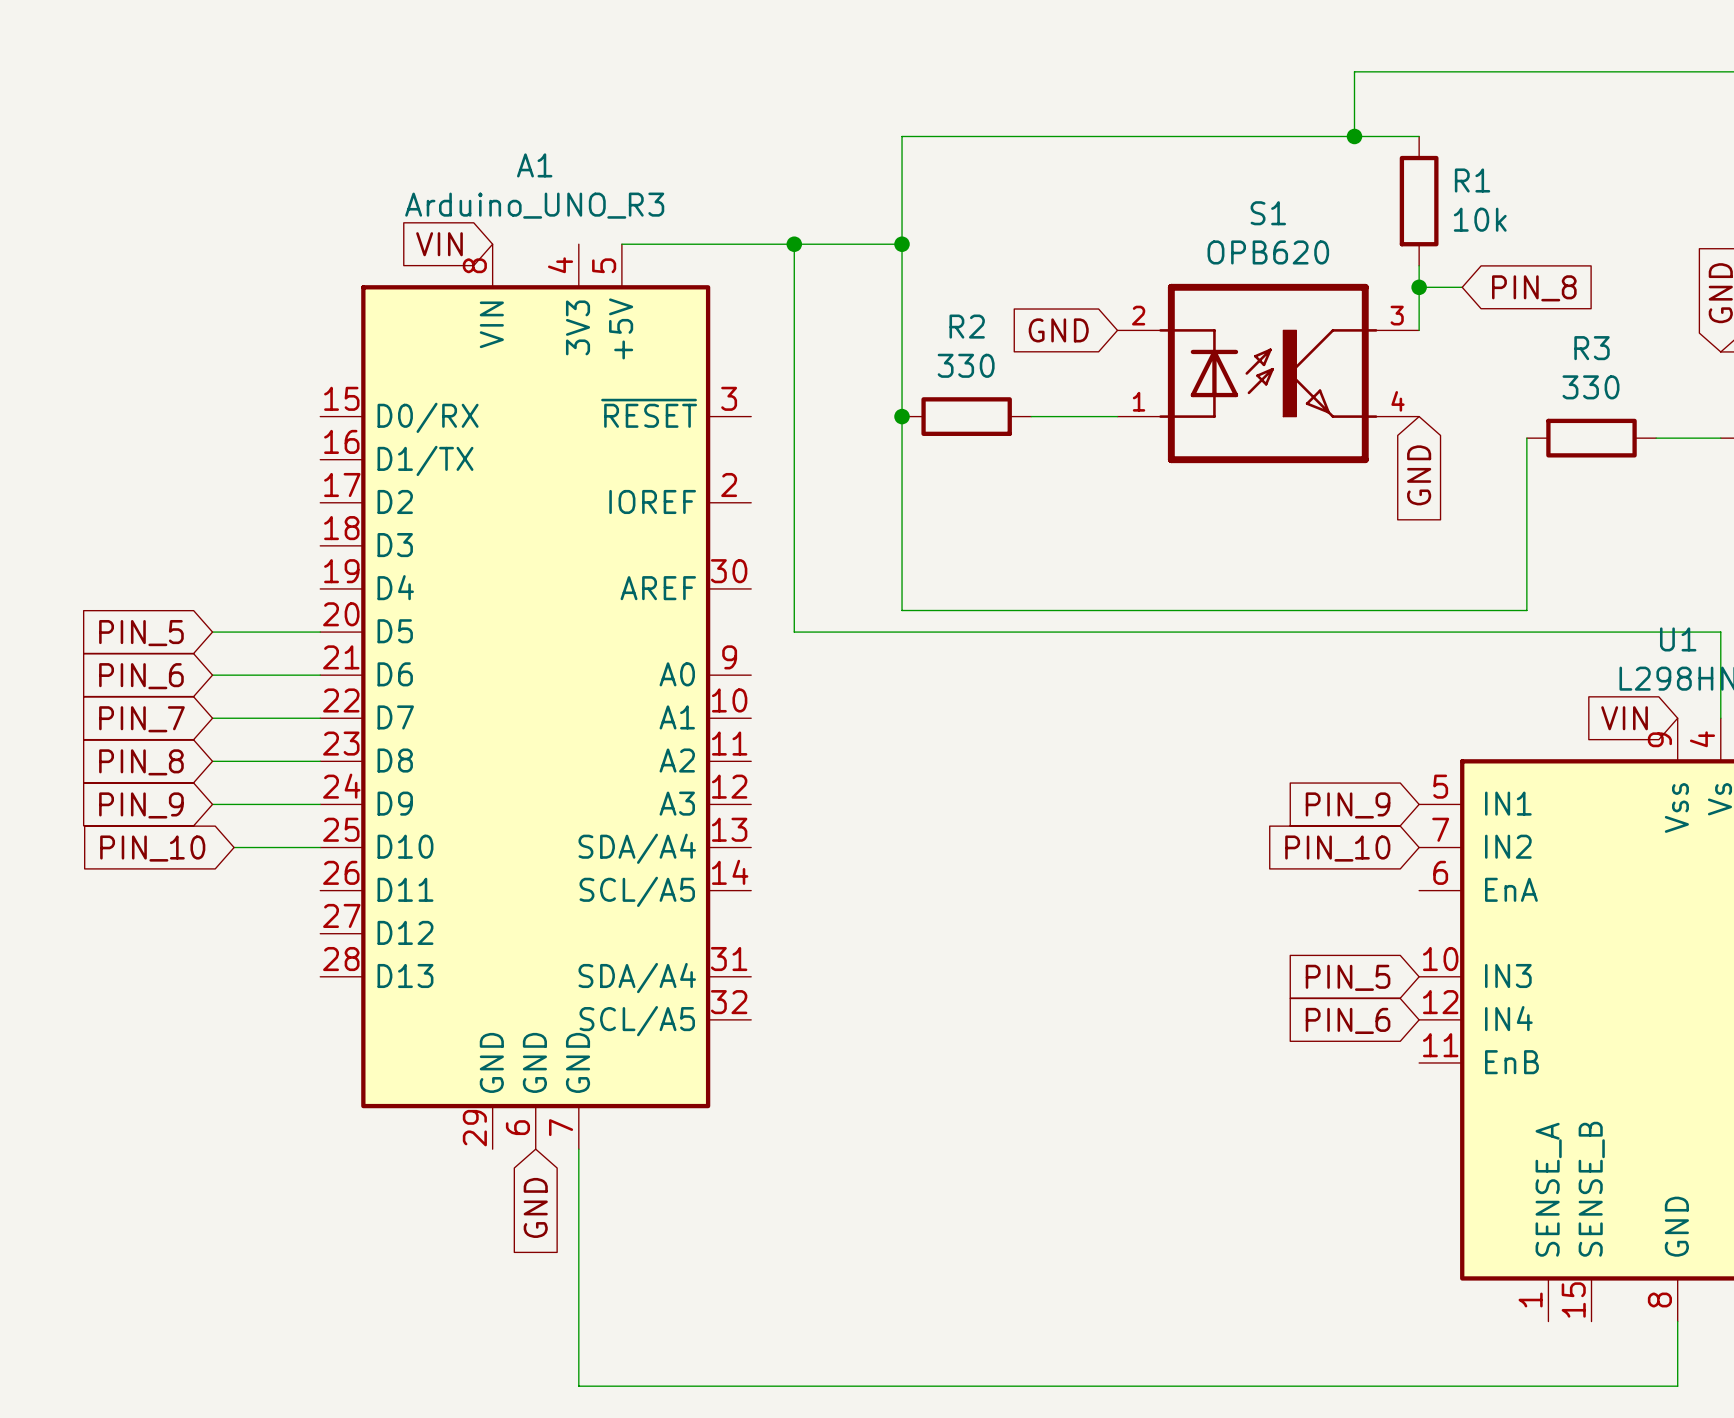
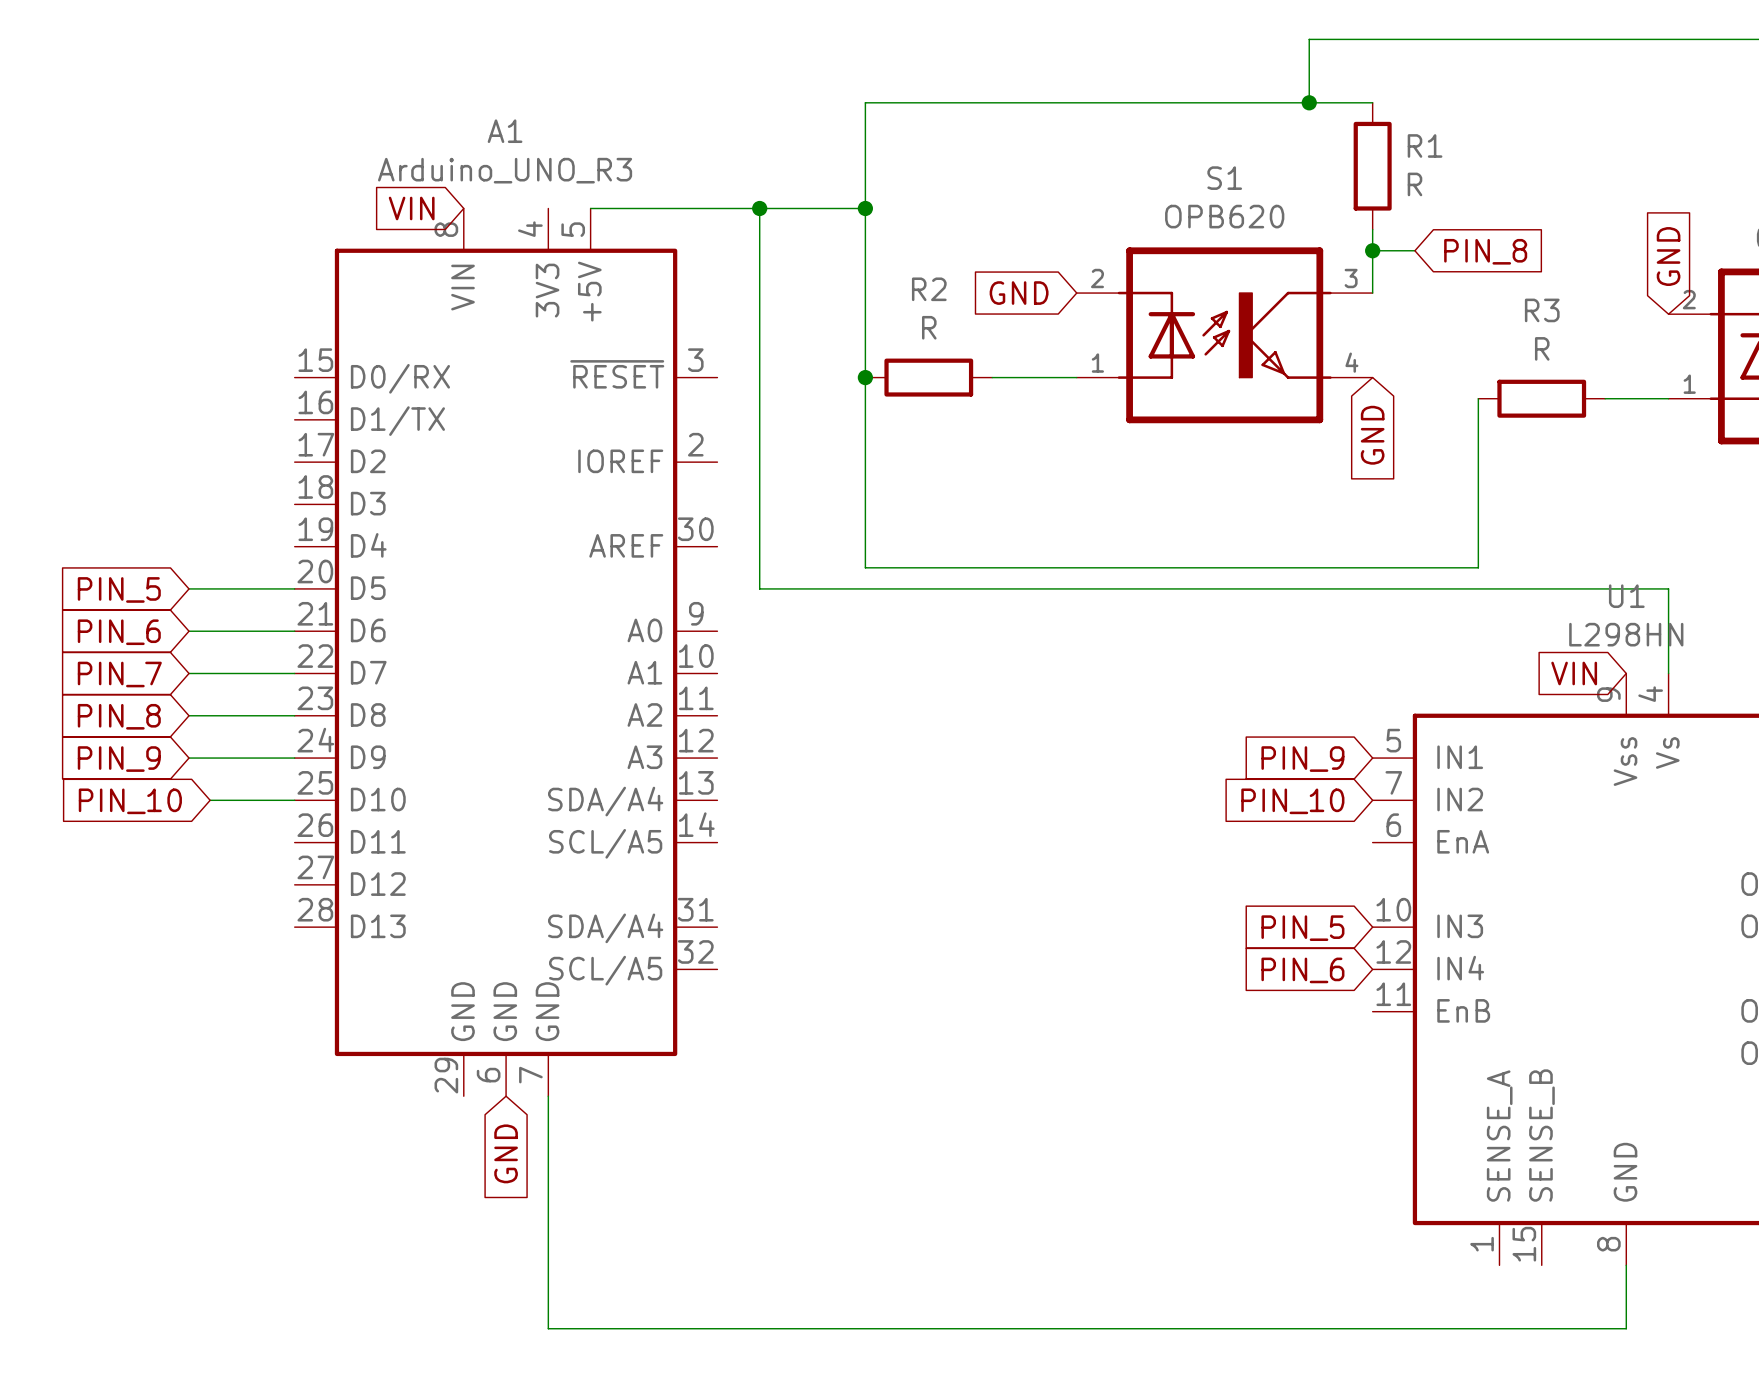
R1 value: 10k (1480, 219) -> R (1414, 184)
R2 value: 330 (966, 365) -> R (929, 327)
R3 value: 330 (1590, 387) -> R (1542, 348)

